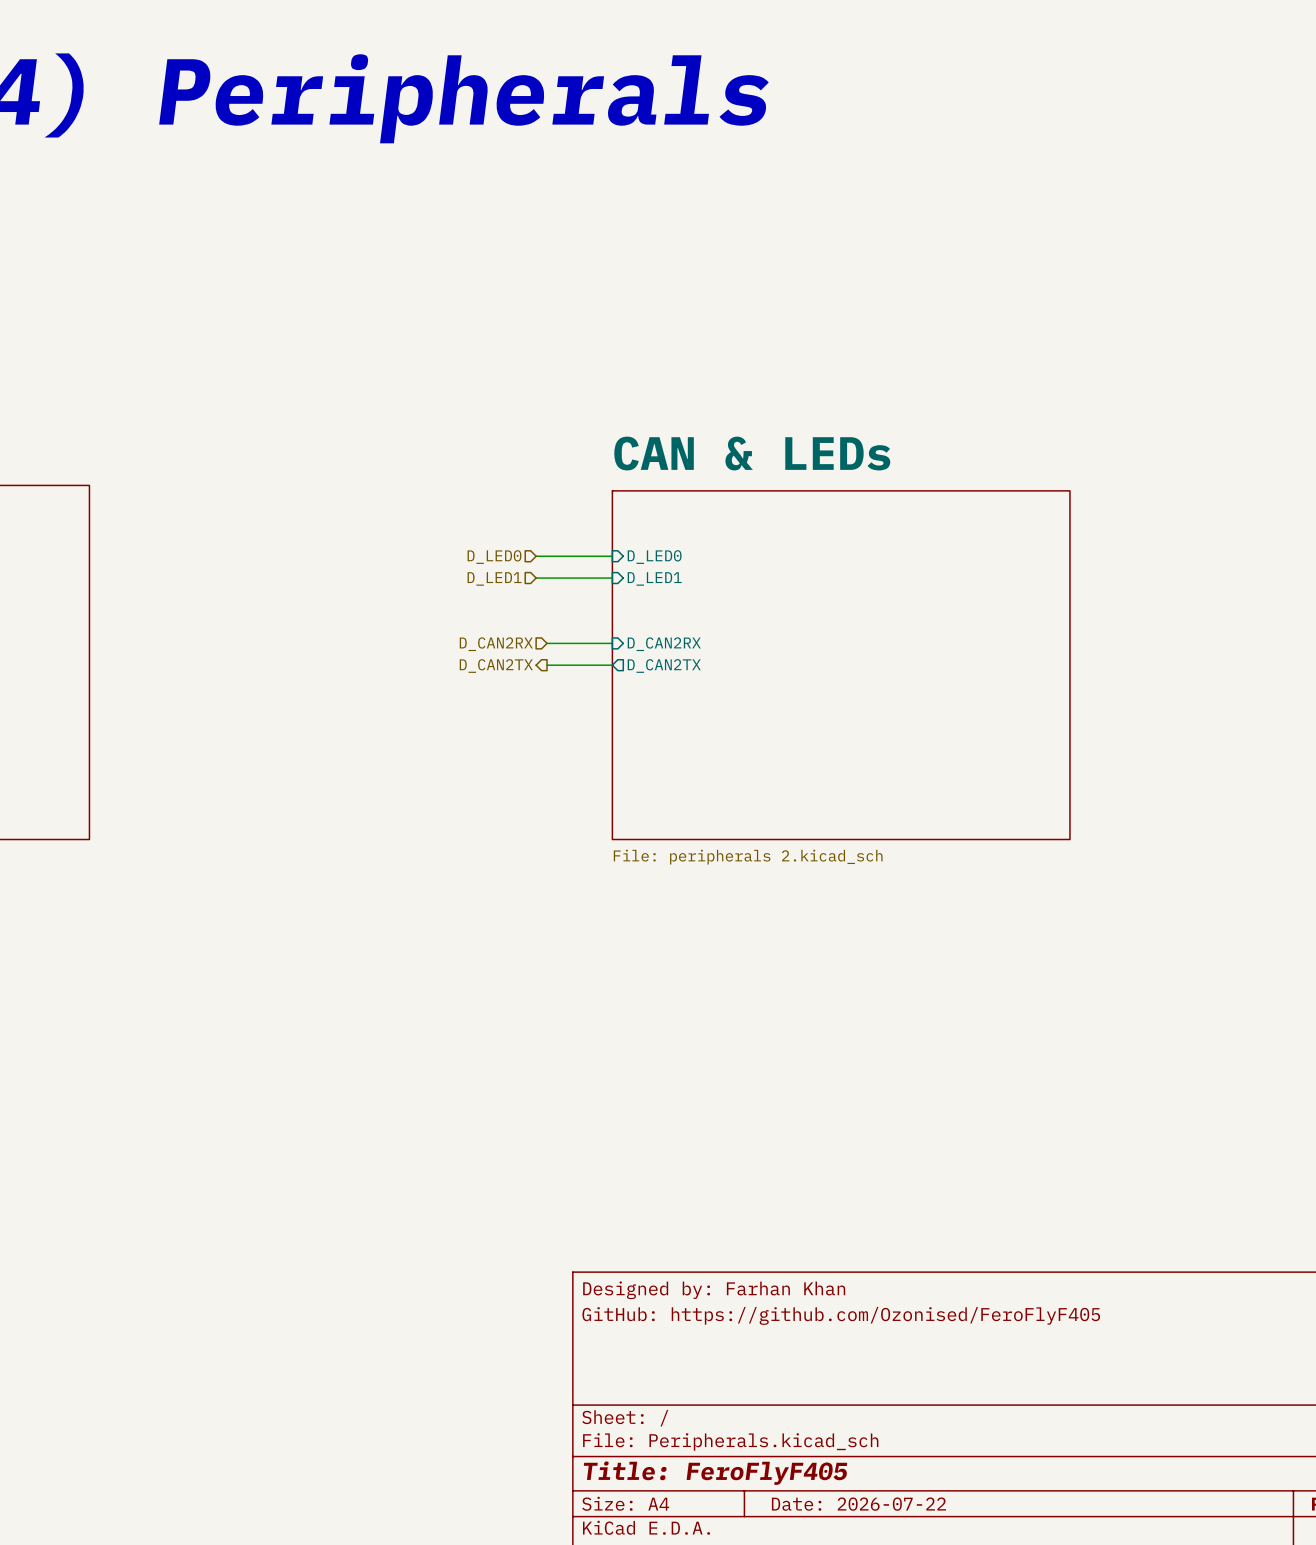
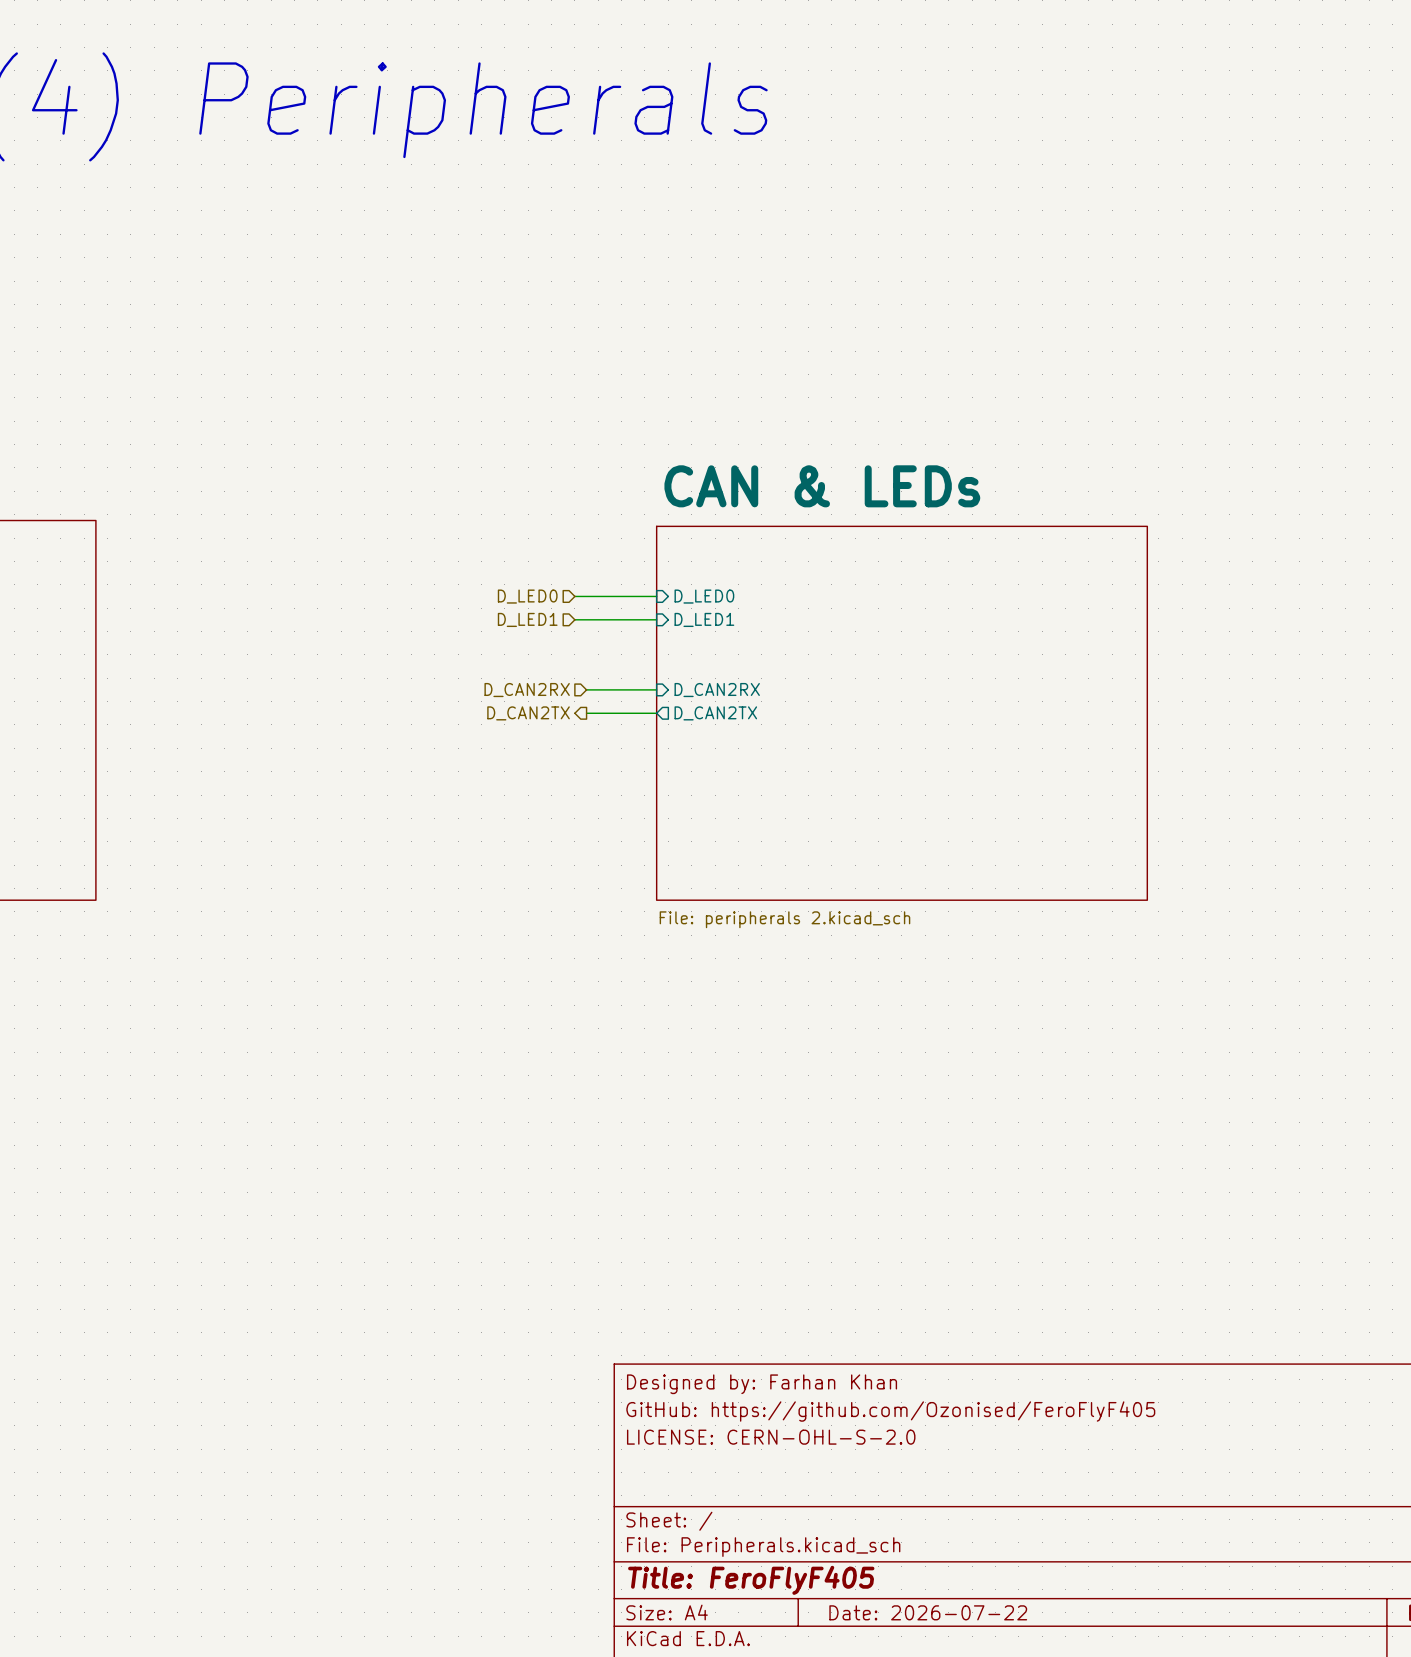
title block: none -> LICENSE: CERN-OHL-S-2.0 (771, 1437)

